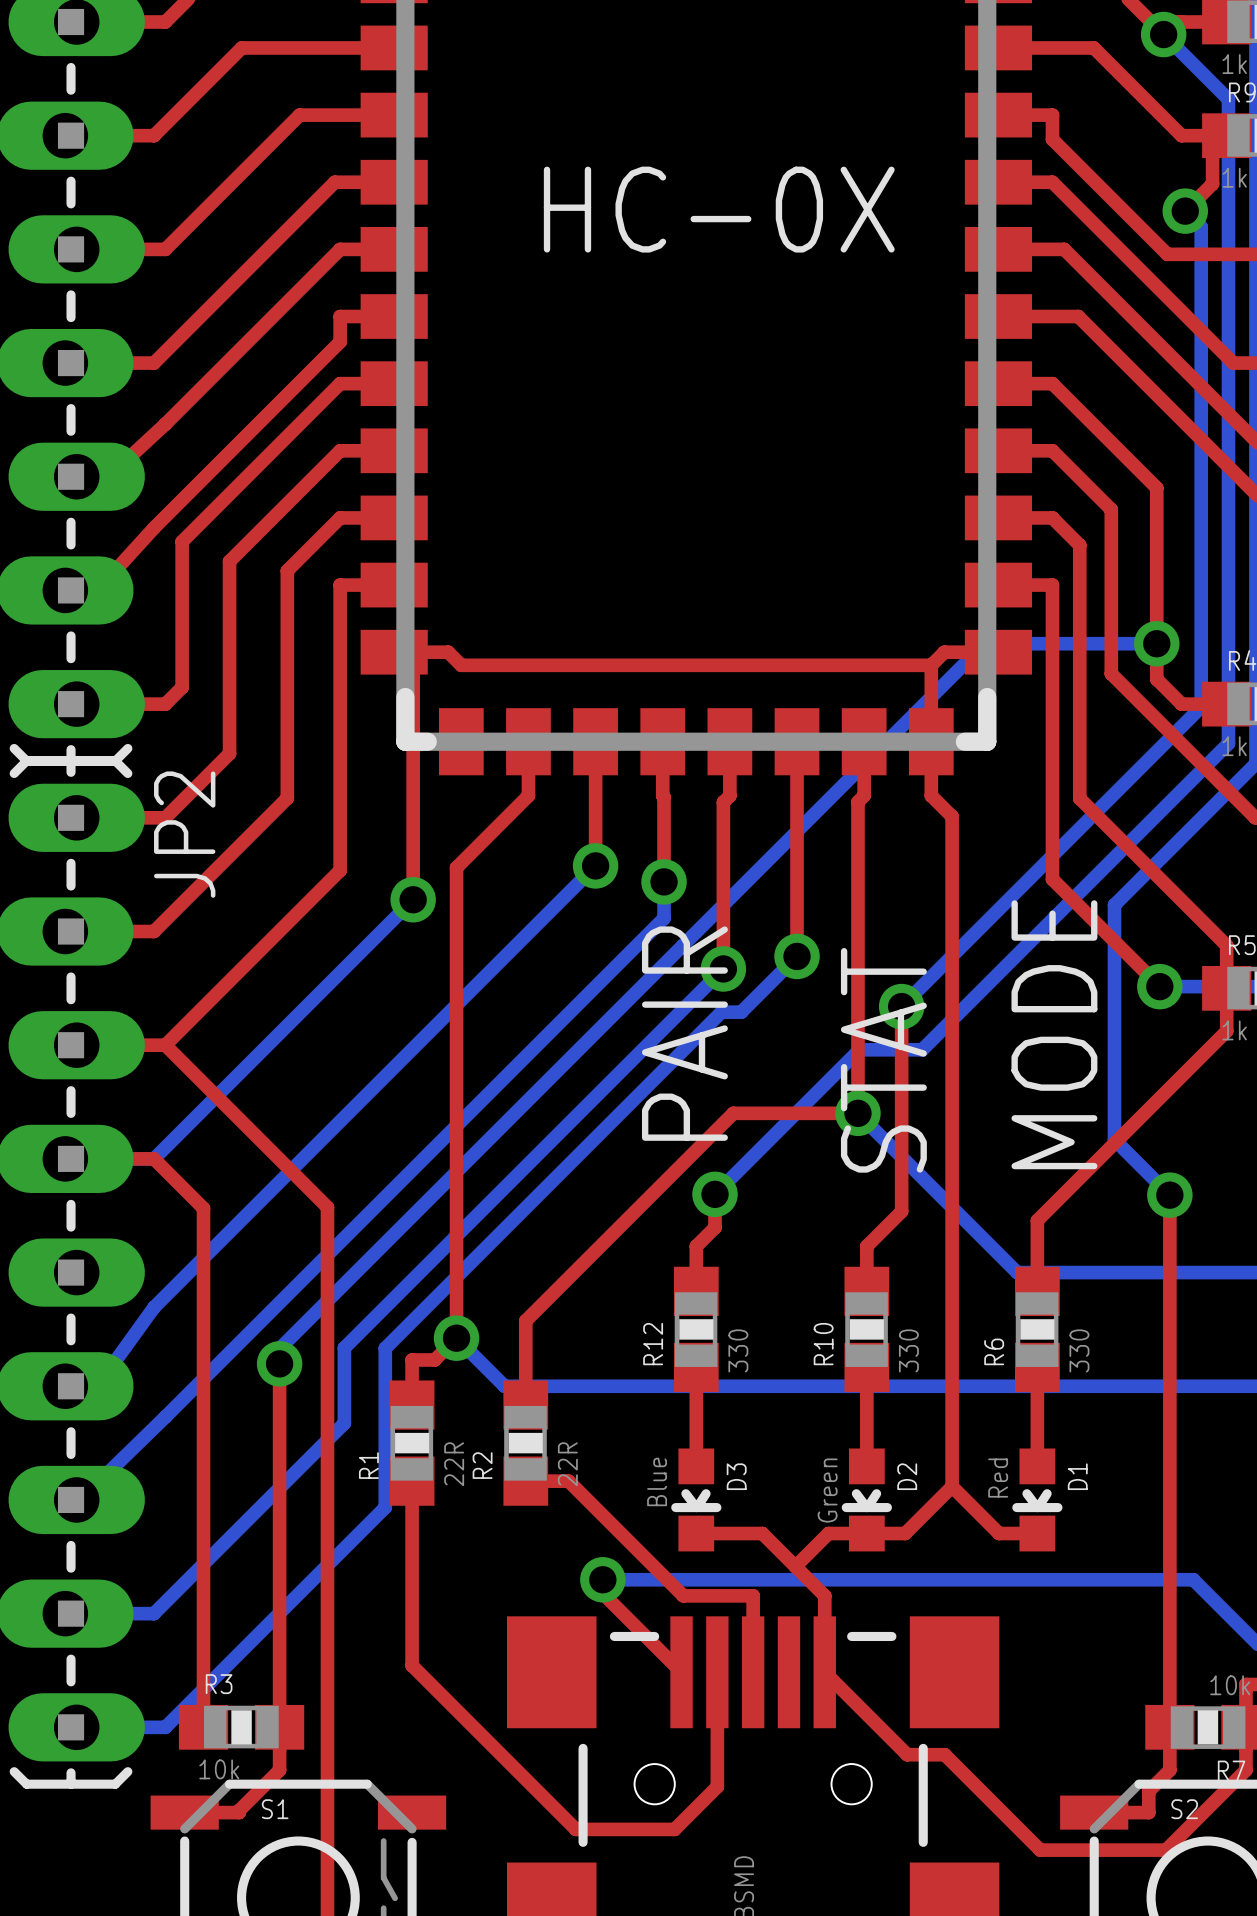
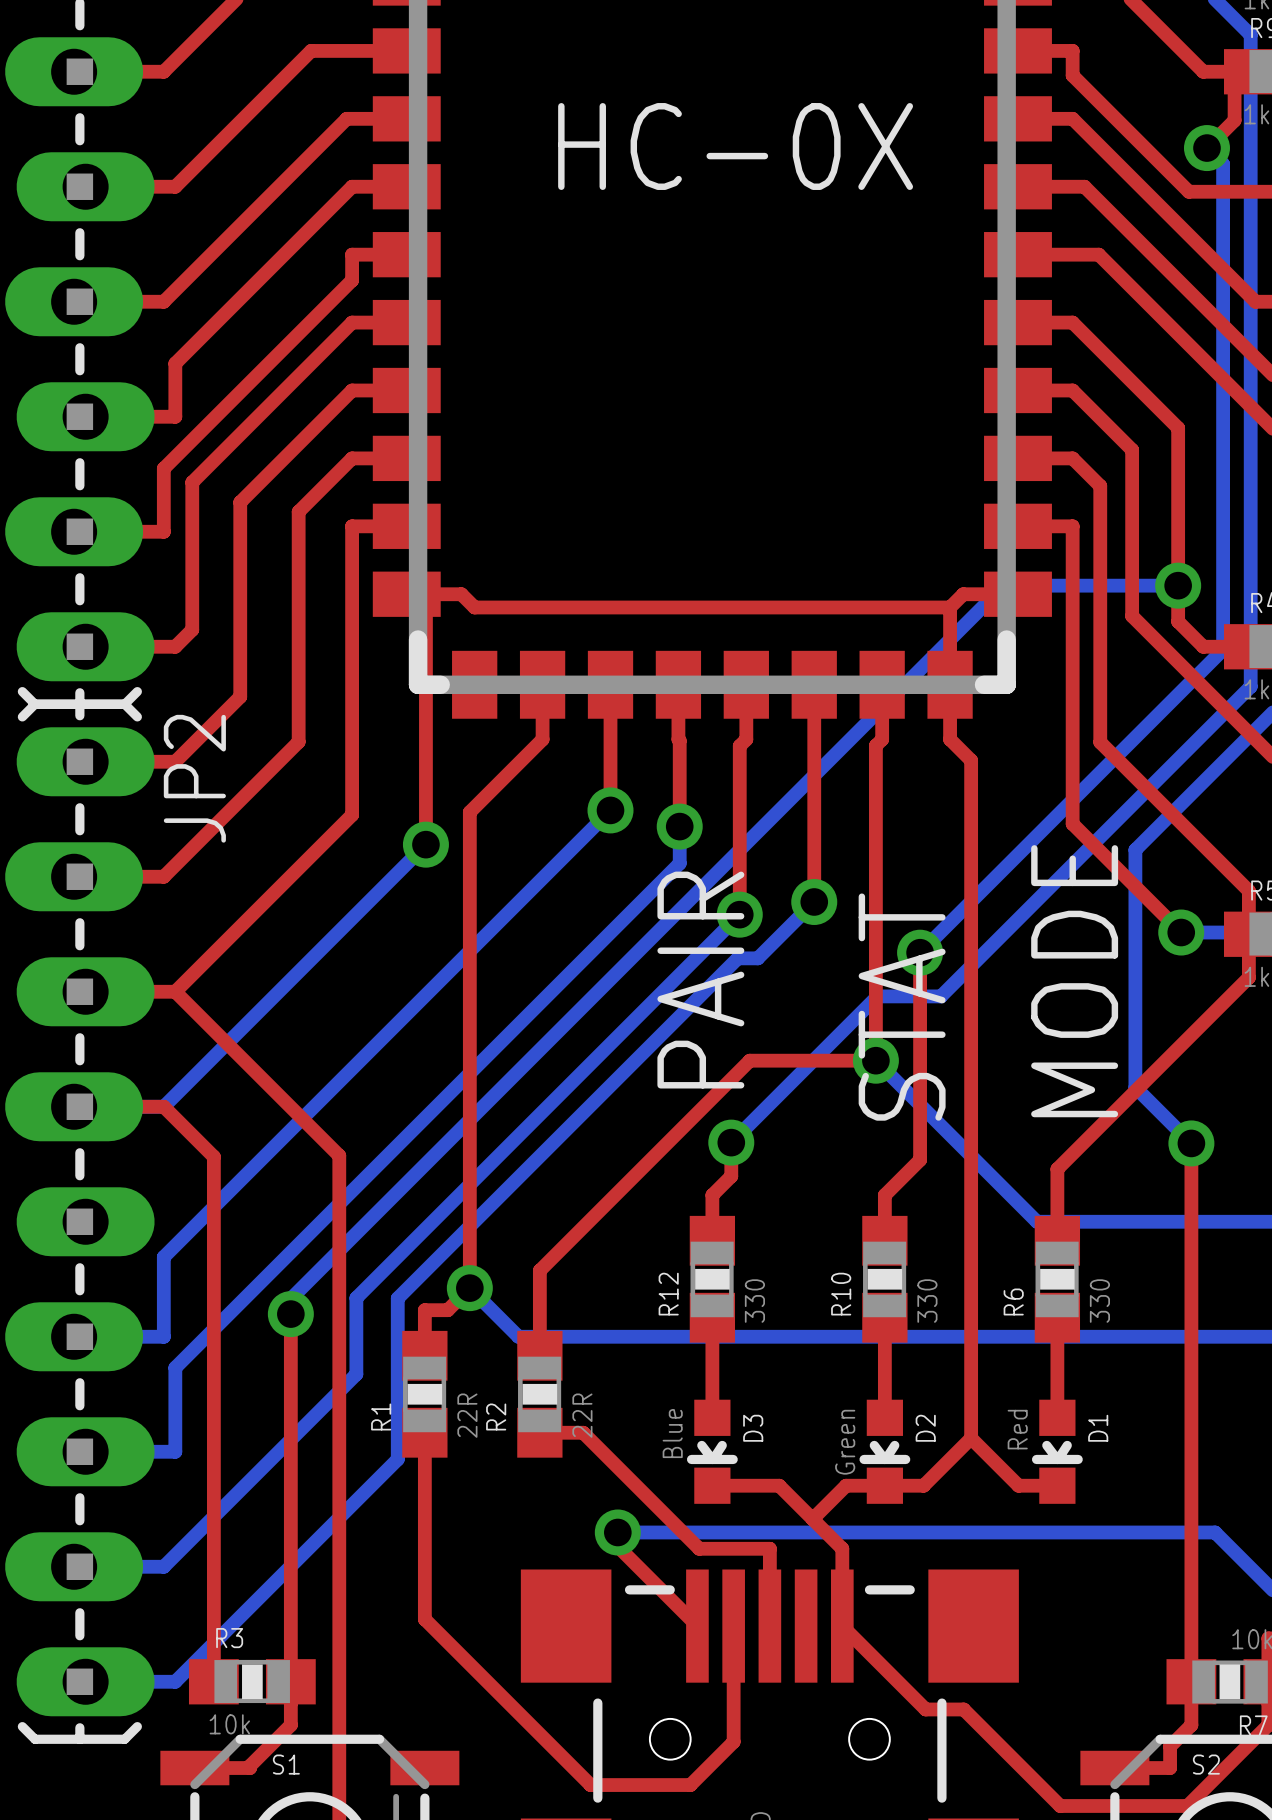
top track: (165, 424) (108, 476) -> (175, 363) (175, 416) (117, 416)
top track: (154, 528) (97, 590) -> (163, 468) (163, 531) (106, 531)
bottom track: (154, 1307) (97, 1386) -> (163, 1257) (163, 1336) (106, 1336)
bottom track: (165, 1416) (80, 1499) -> (175, 1367) (175, 1451) (89, 1451)

